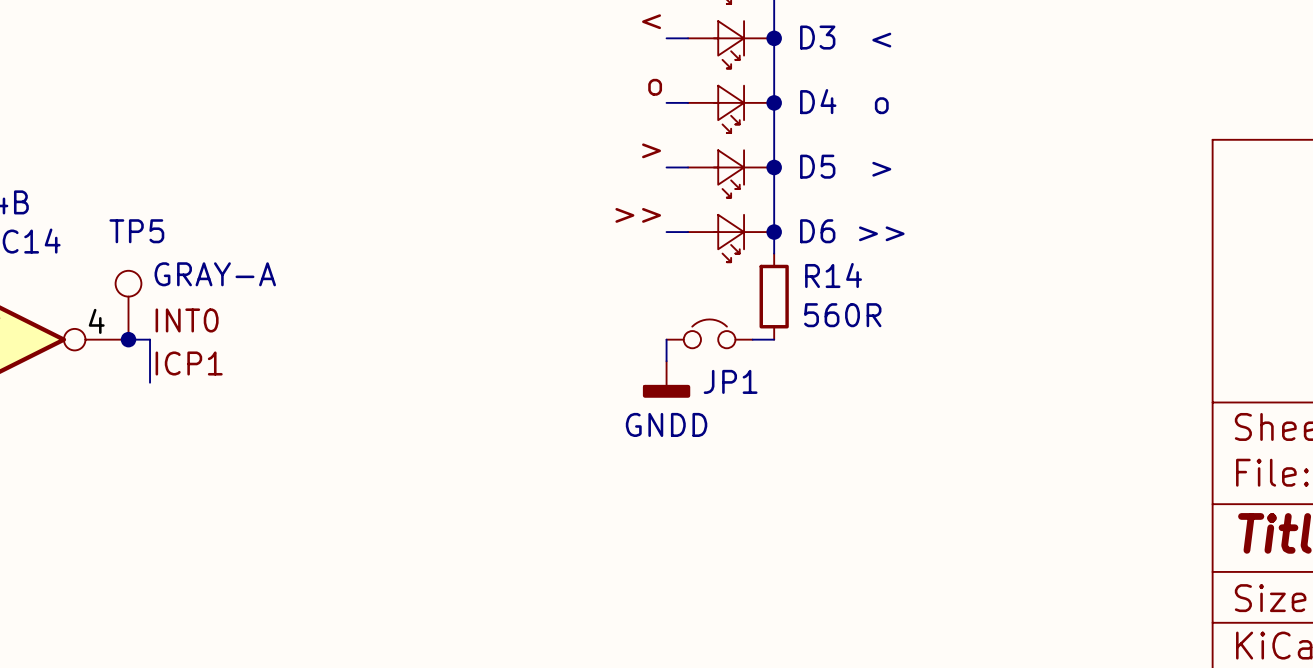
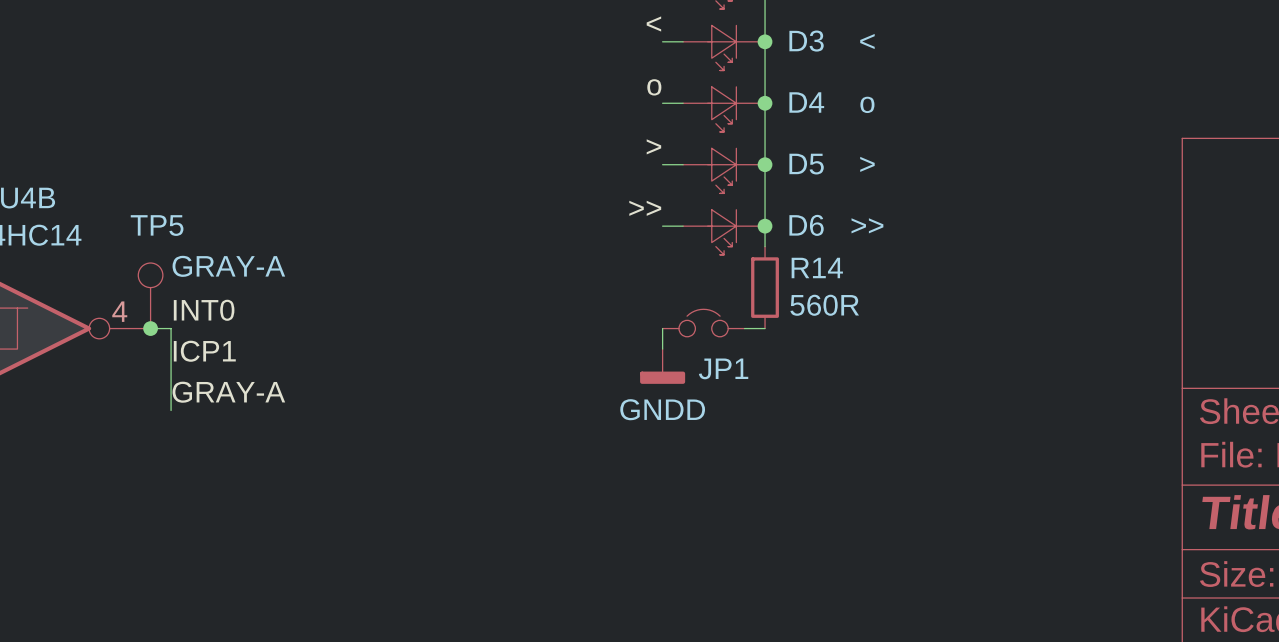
wire: none -> (171, 369) (171, 410)
label: none -> GRAY-A (228, 392)

